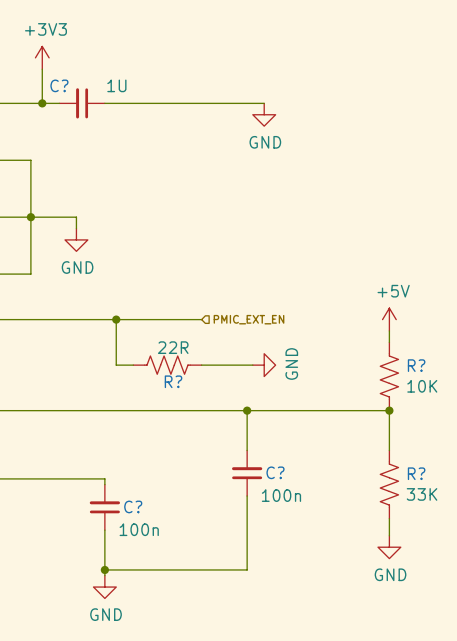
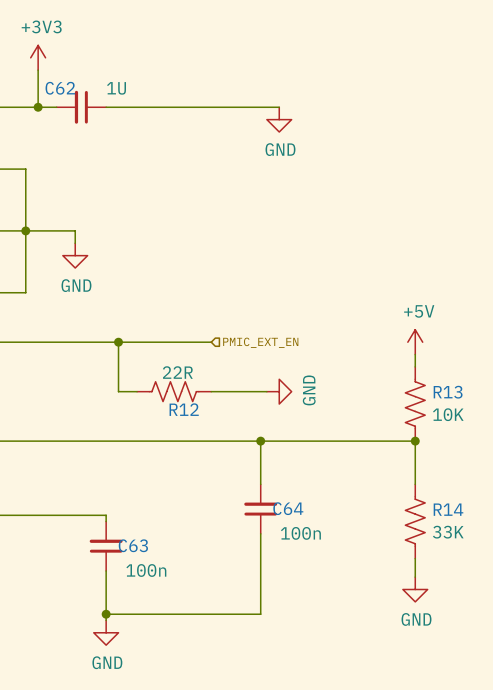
C? name: C? (59, 85) -> C62 (60, 88)
R? name: R? (416, 365) -> R13 (448, 392)
R? name: R? (173, 381) -> R12 (184, 409)
C? name: C? (275, 472) -> C64 (288, 508)
R? name: R? (416, 473) -> R14 (448, 509)
C? name: C? (133, 506) -> C63 (133, 545)

